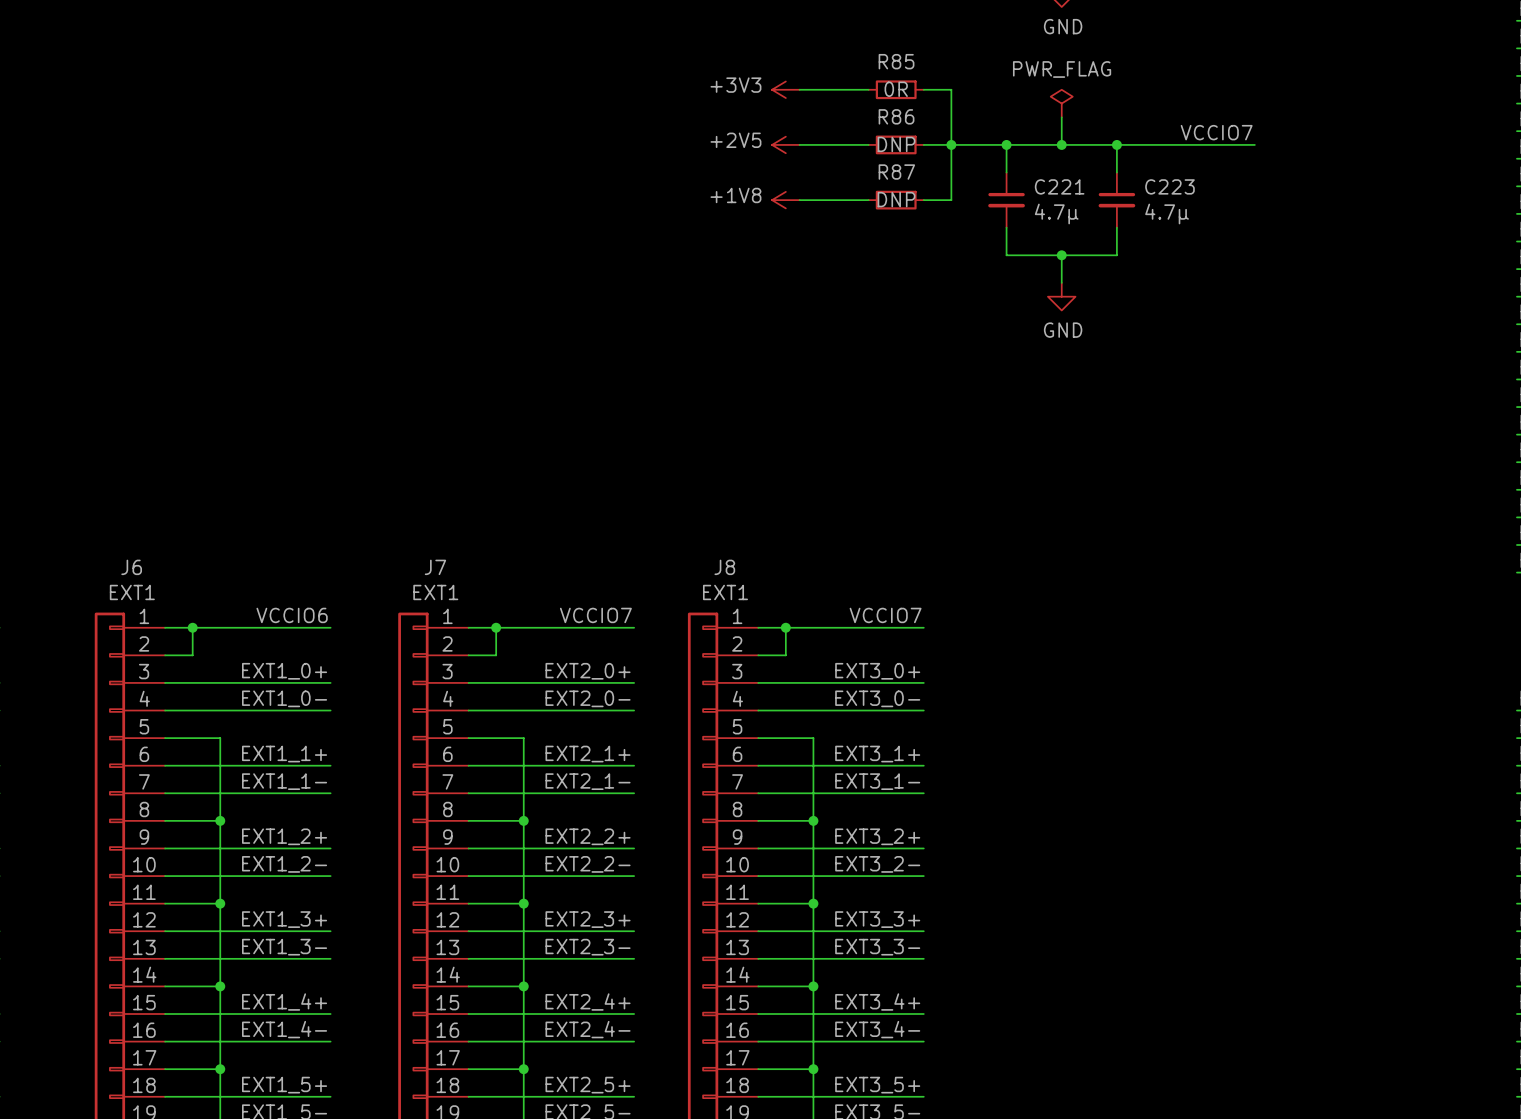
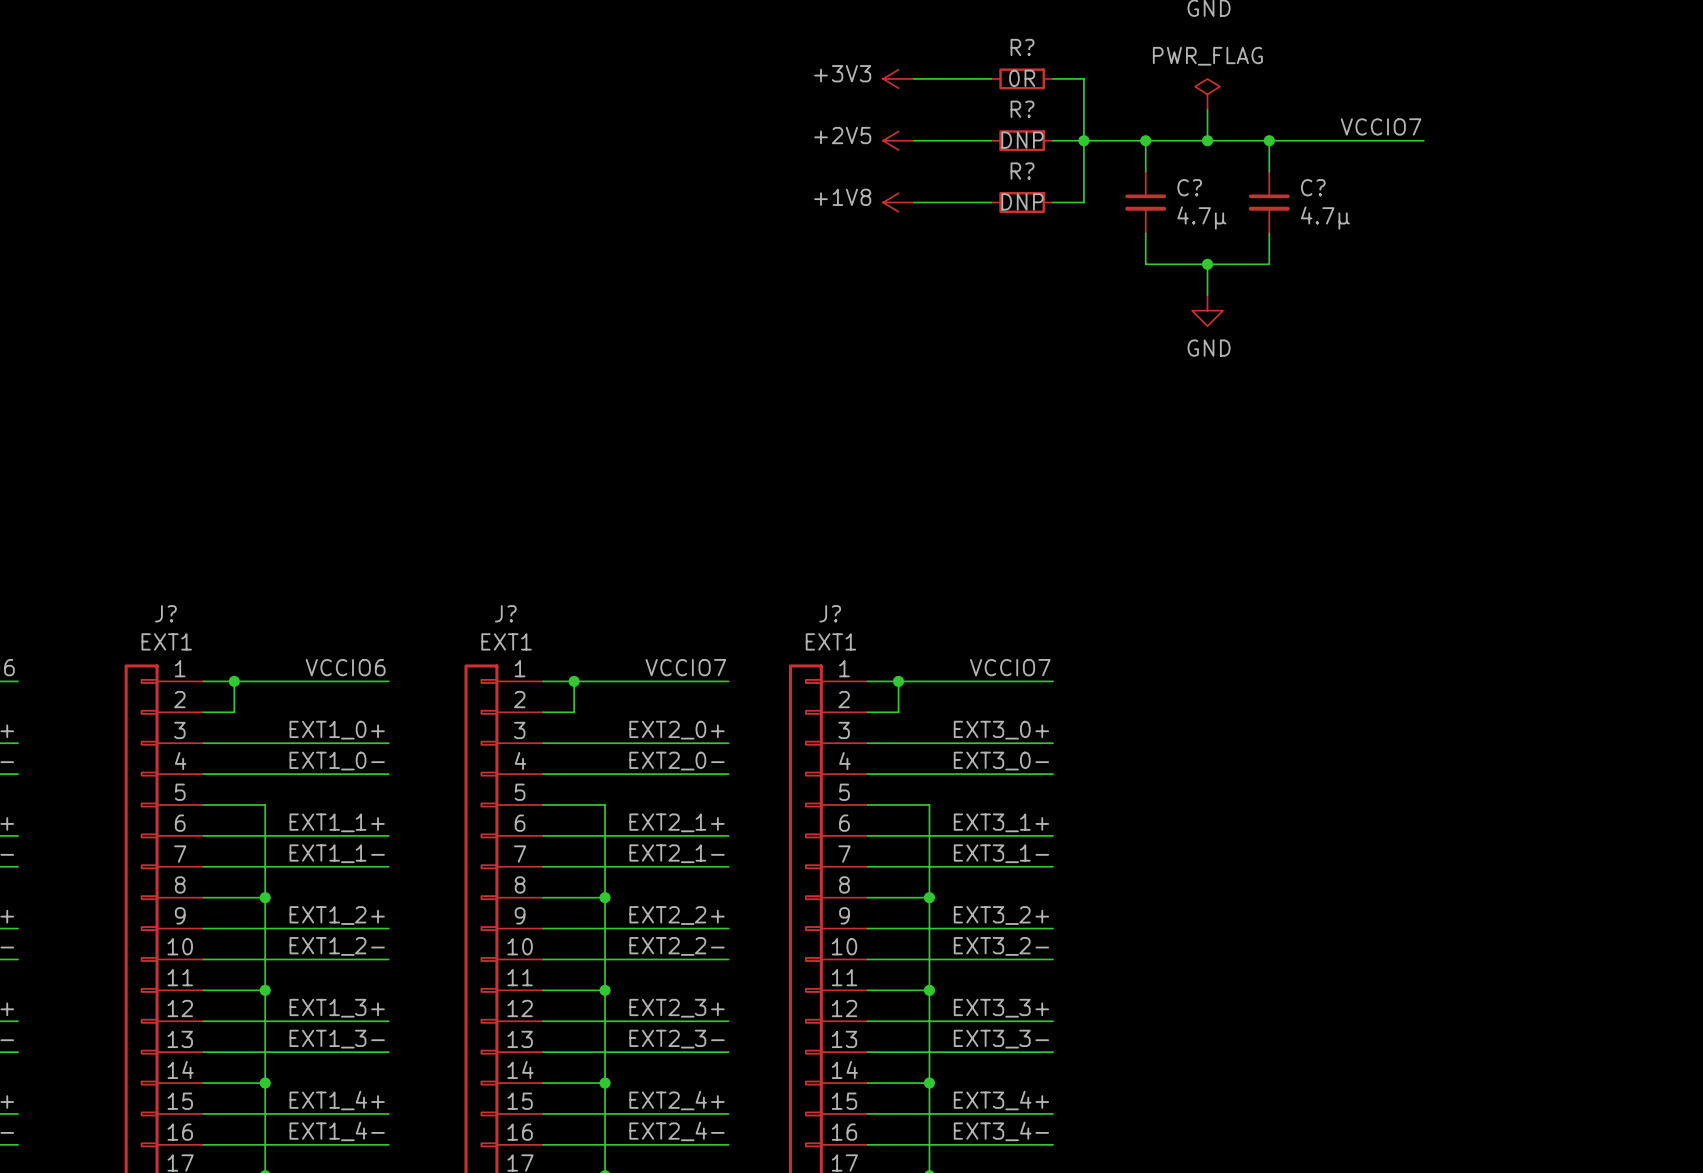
R85 name: R85 (896, 61) -> R? (1022, 47)
R86 name: R86 (896, 116) -> R? (1022, 109)
R87 name: R87 (896, 172) -> R? (1022, 171)
C221 name: C221 (1059, 186) -> C? (1189, 187)
C223 name: C223 (1169, 186) -> C? (1313, 187)
J6 name: J6 (131, 567) -> J? (165, 613)
J7 name: J7 (435, 567) -> J? (505, 613)
J8 name: J8 (724, 567) -> J? (830, 613)

